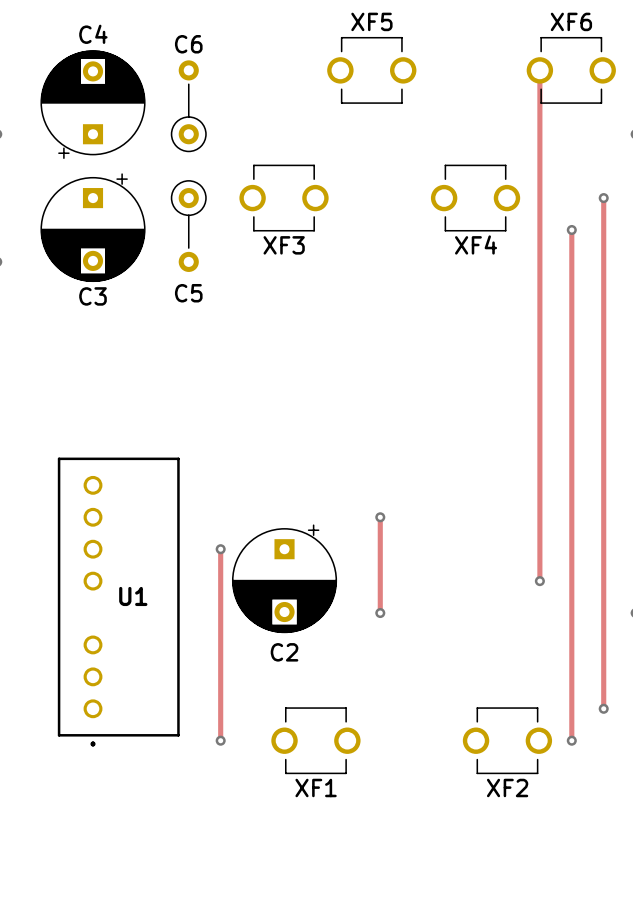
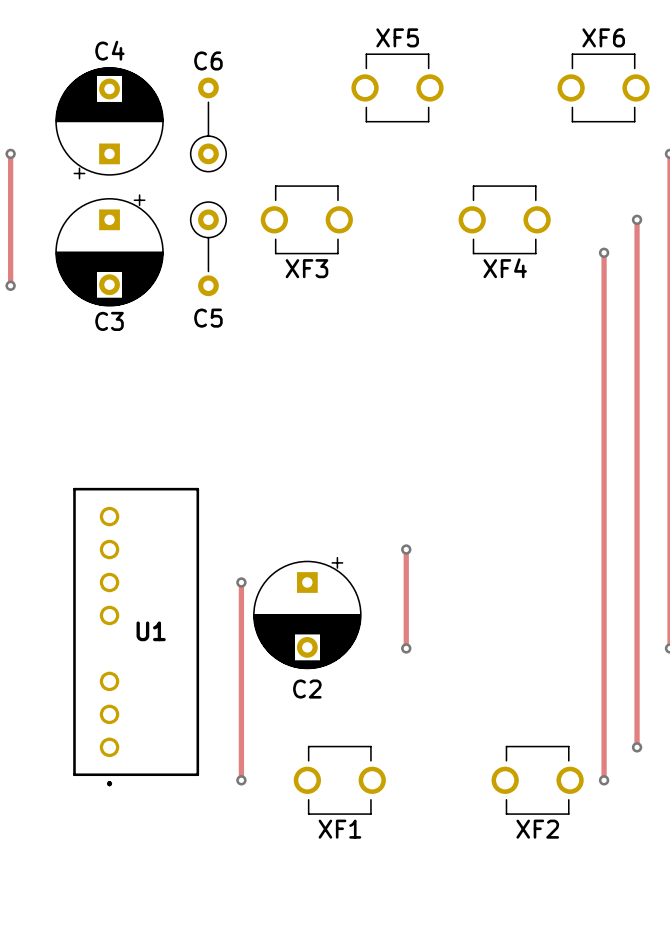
track: (539, 70) (539, 581) -> none
via: (539, 581) -> none

